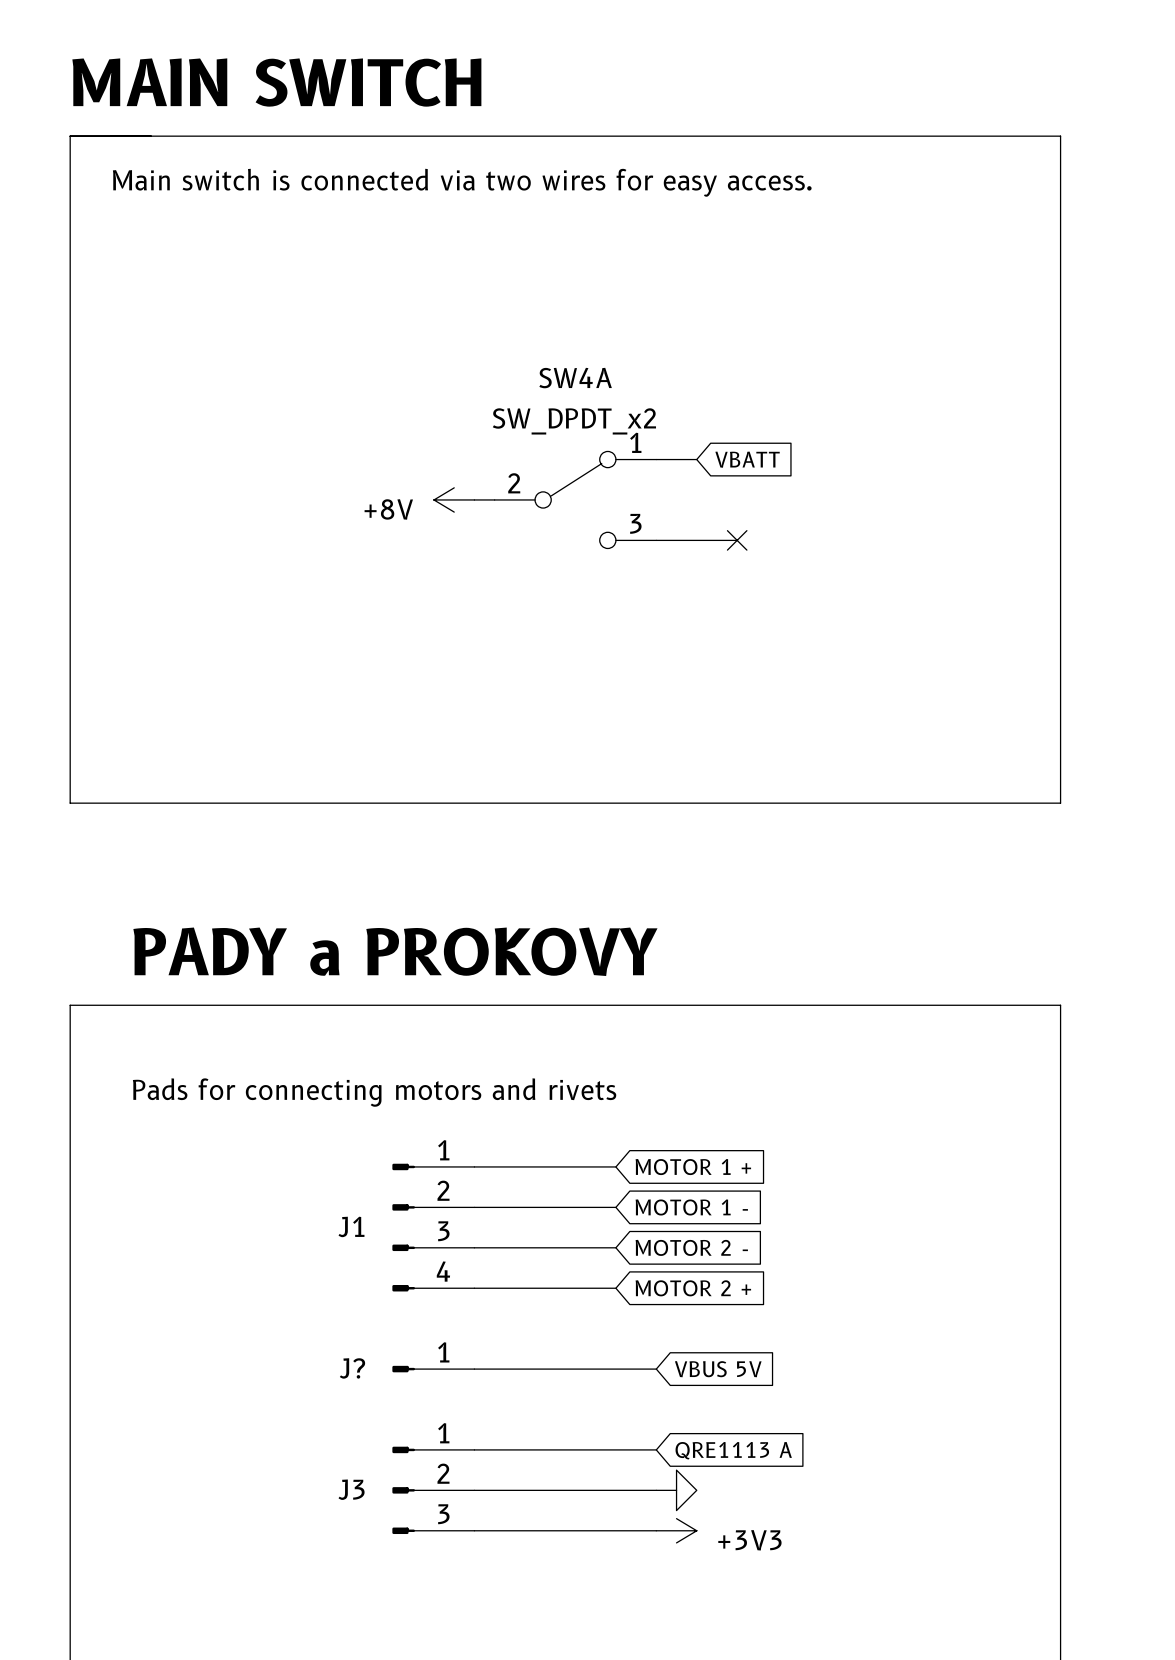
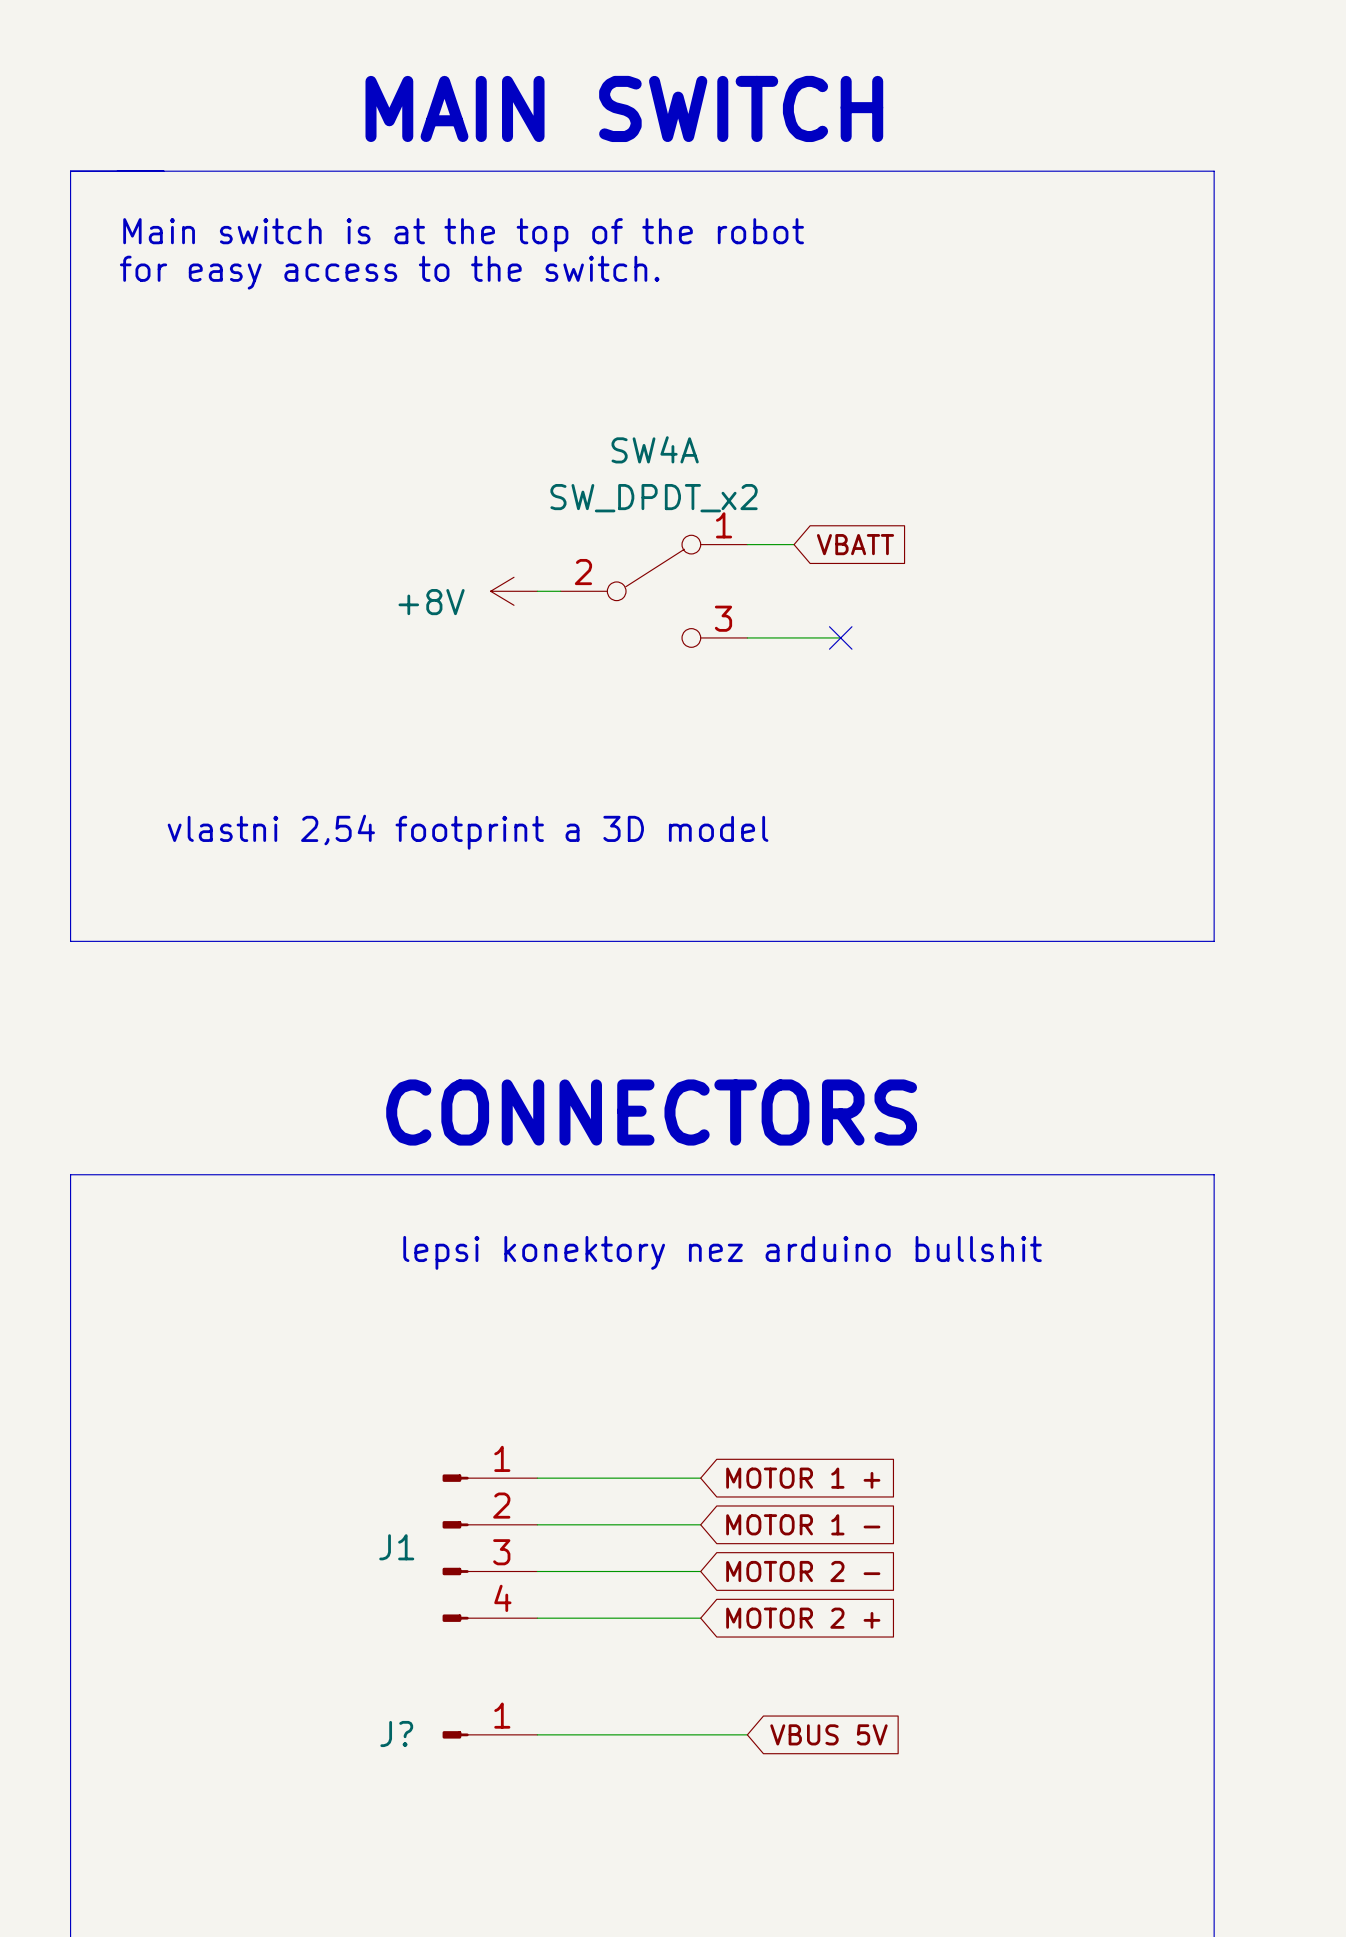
text position: MAIN SWITCH (276, 82) -> MAIN SWITCH (624, 108)
text: Main switch is connected via two wires for easy access. (462, 182) -> Main switch is at the top of the robot (463, 235)
text: none -> for easy access to the switch. (389, 272)
text: none -> vlastni 2,54 footprint a 3D model (468, 832)
text: PADY a PROKOVY (395, 951) -> none
text: none -> CONNECTORS (651, 1112)
text: none -> lepsi konektory nez arduino bullshit (722, 1252)
text: Pads for connecting motors and rivets (374, 1092) -> none
wire: (474, 1166) (615, 1166) -> (537, 1478) (700, 1478)
global label position: MOTOR 1 + (693, 1167) -> MOTOR 1 + (803, 1478)
wire: (474, 1207) (615, 1207) -> (537, 1524) (700, 1524)
global label position: MOTOR 1 - (691, 1207) -> MOTOR 1 - (803, 1524)
J1 position: (433, 1227) -> (489, 1548)
wire: (474, 1247) (615, 1247) -> (537, 1571) (700, 1571)
global label position: MOTOR 2 - (691, 1247) -> MOTOR 2 - (803, 1571)
wire: (474, 1288) (615, 1288) -> (537, 1618) (700, 1618)
global label position: MOTOR 2 + (693, 1288) -> MOTOR 2 + (803, 1618)
J? position: (433, 1369) -> (489, 1734)
wire: (474, 1369) (656, 1369) -> none
global label position: VBUS 5V (718, 1369) -> VBUS 5V (828, 1734)
wire: (474, 1449) (656, 1449) -> none
global label: QRE1113 A (733, 1450) -> none
J3: (433, 1490) -> none
power symbol: (676, 1490) -> none
wire: (474, 1530) (656, 1530) -> none
power symbol: +3V3 (676, 1530) -> none

